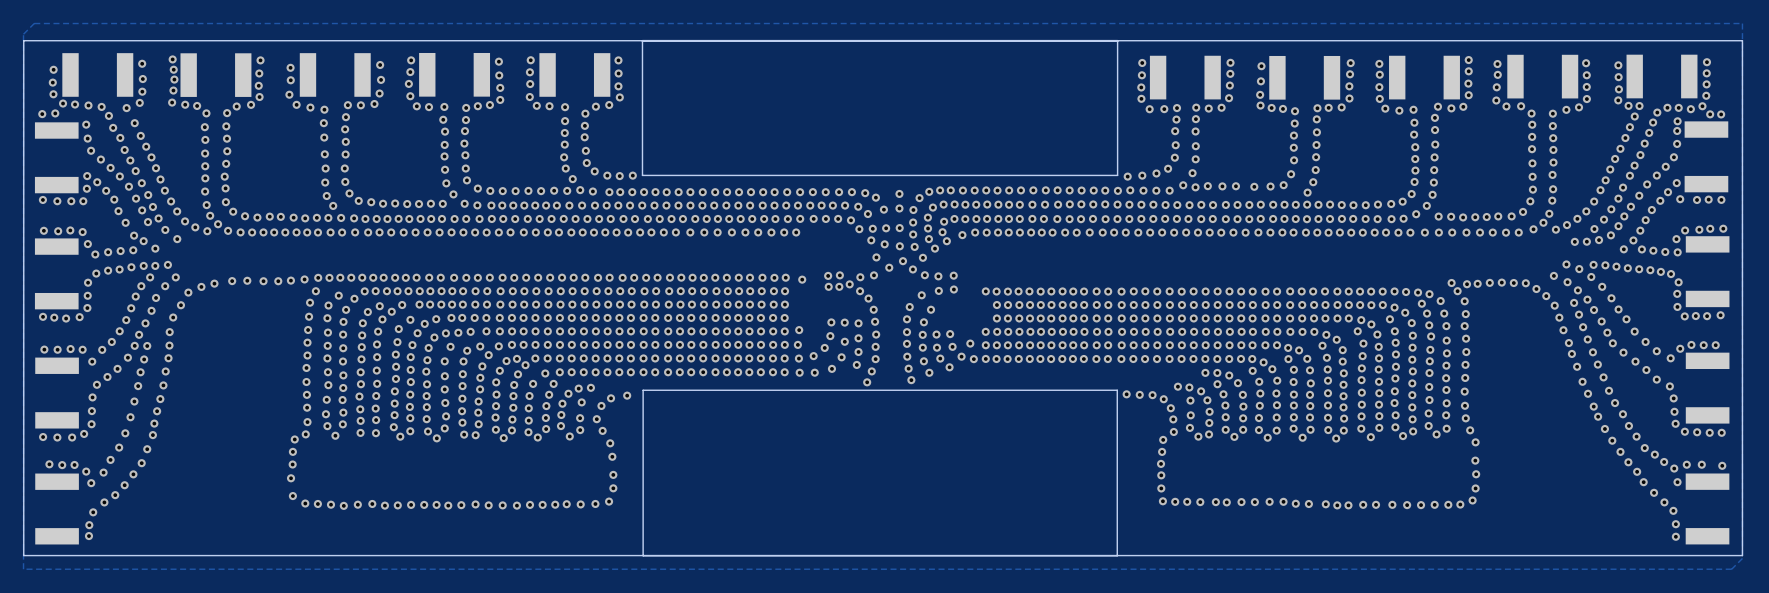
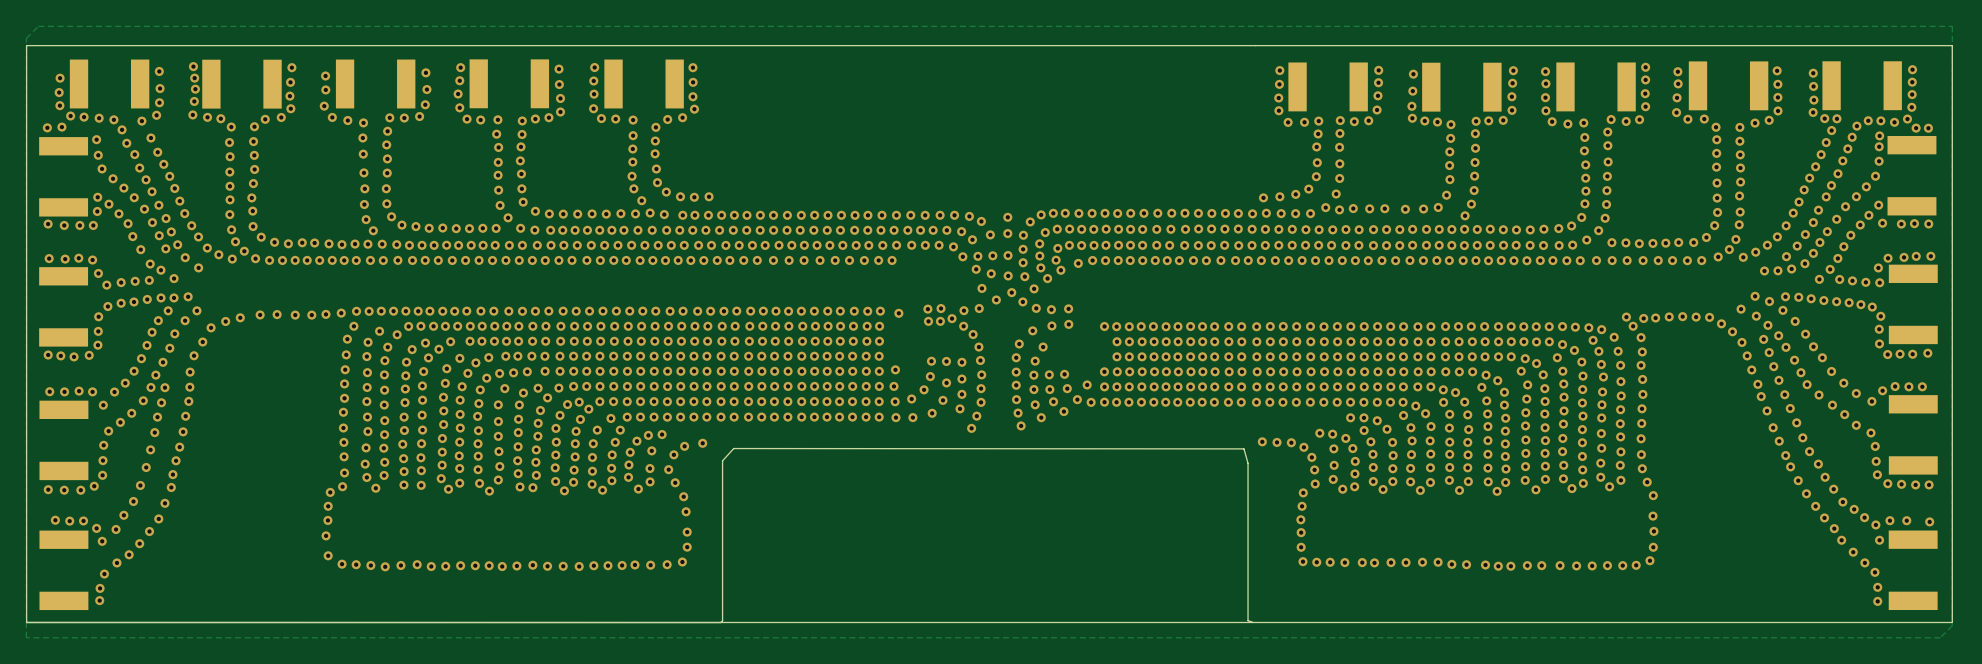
board edge: (1117, 40) (1117, 175) (642, 175) (642, 40) (1117, 40) -> none
board edge: (643, 555) (1117, 555) (1117, 390) (643, 390) (643, 555) -> (720, 622) (722, 620) (722, 460) (733, 448) (1243, 448) (1248, 463) (1248, 620) (1252, 622)

